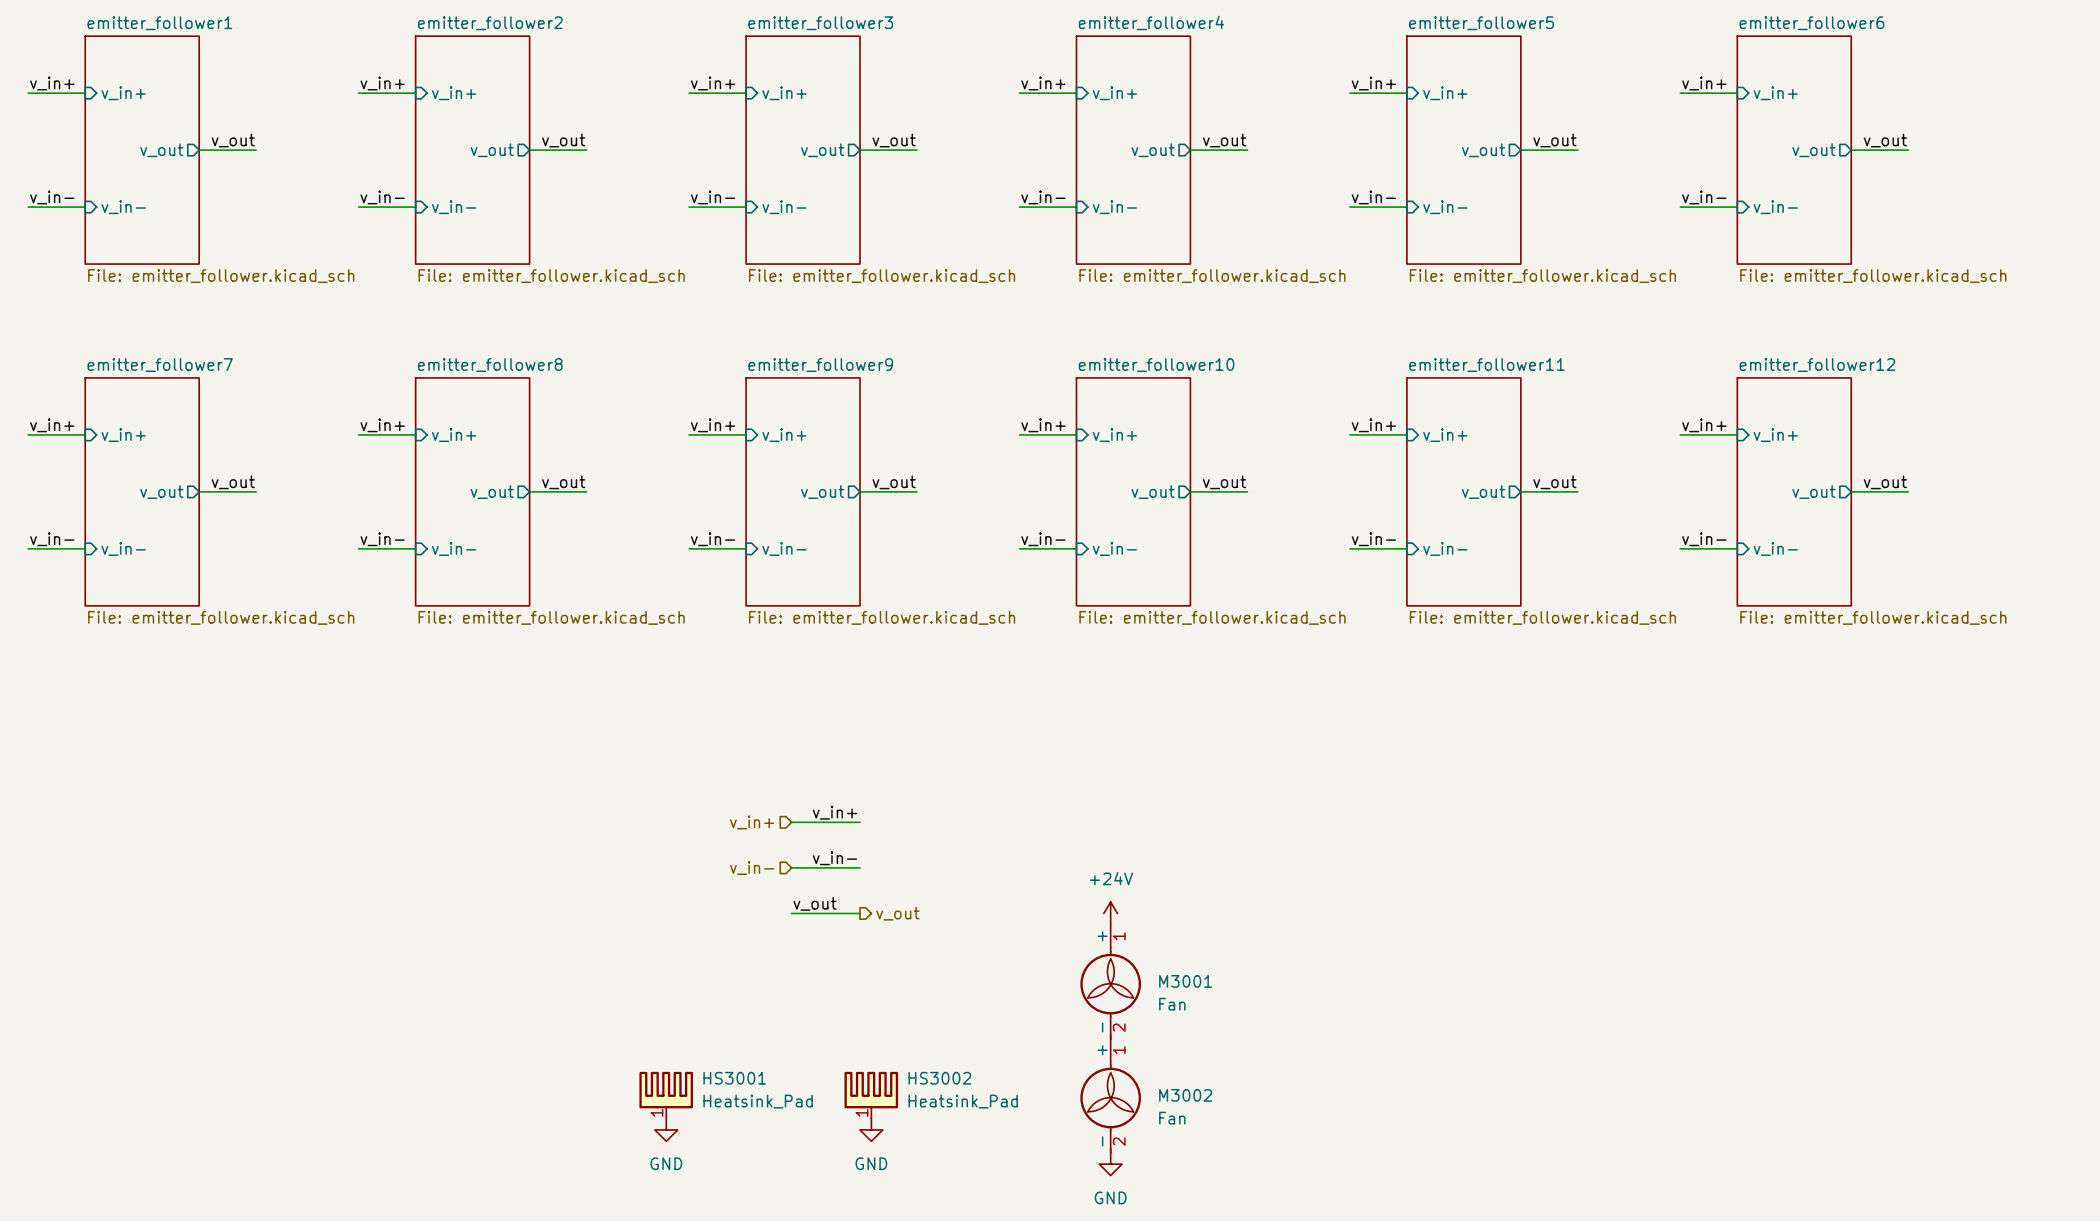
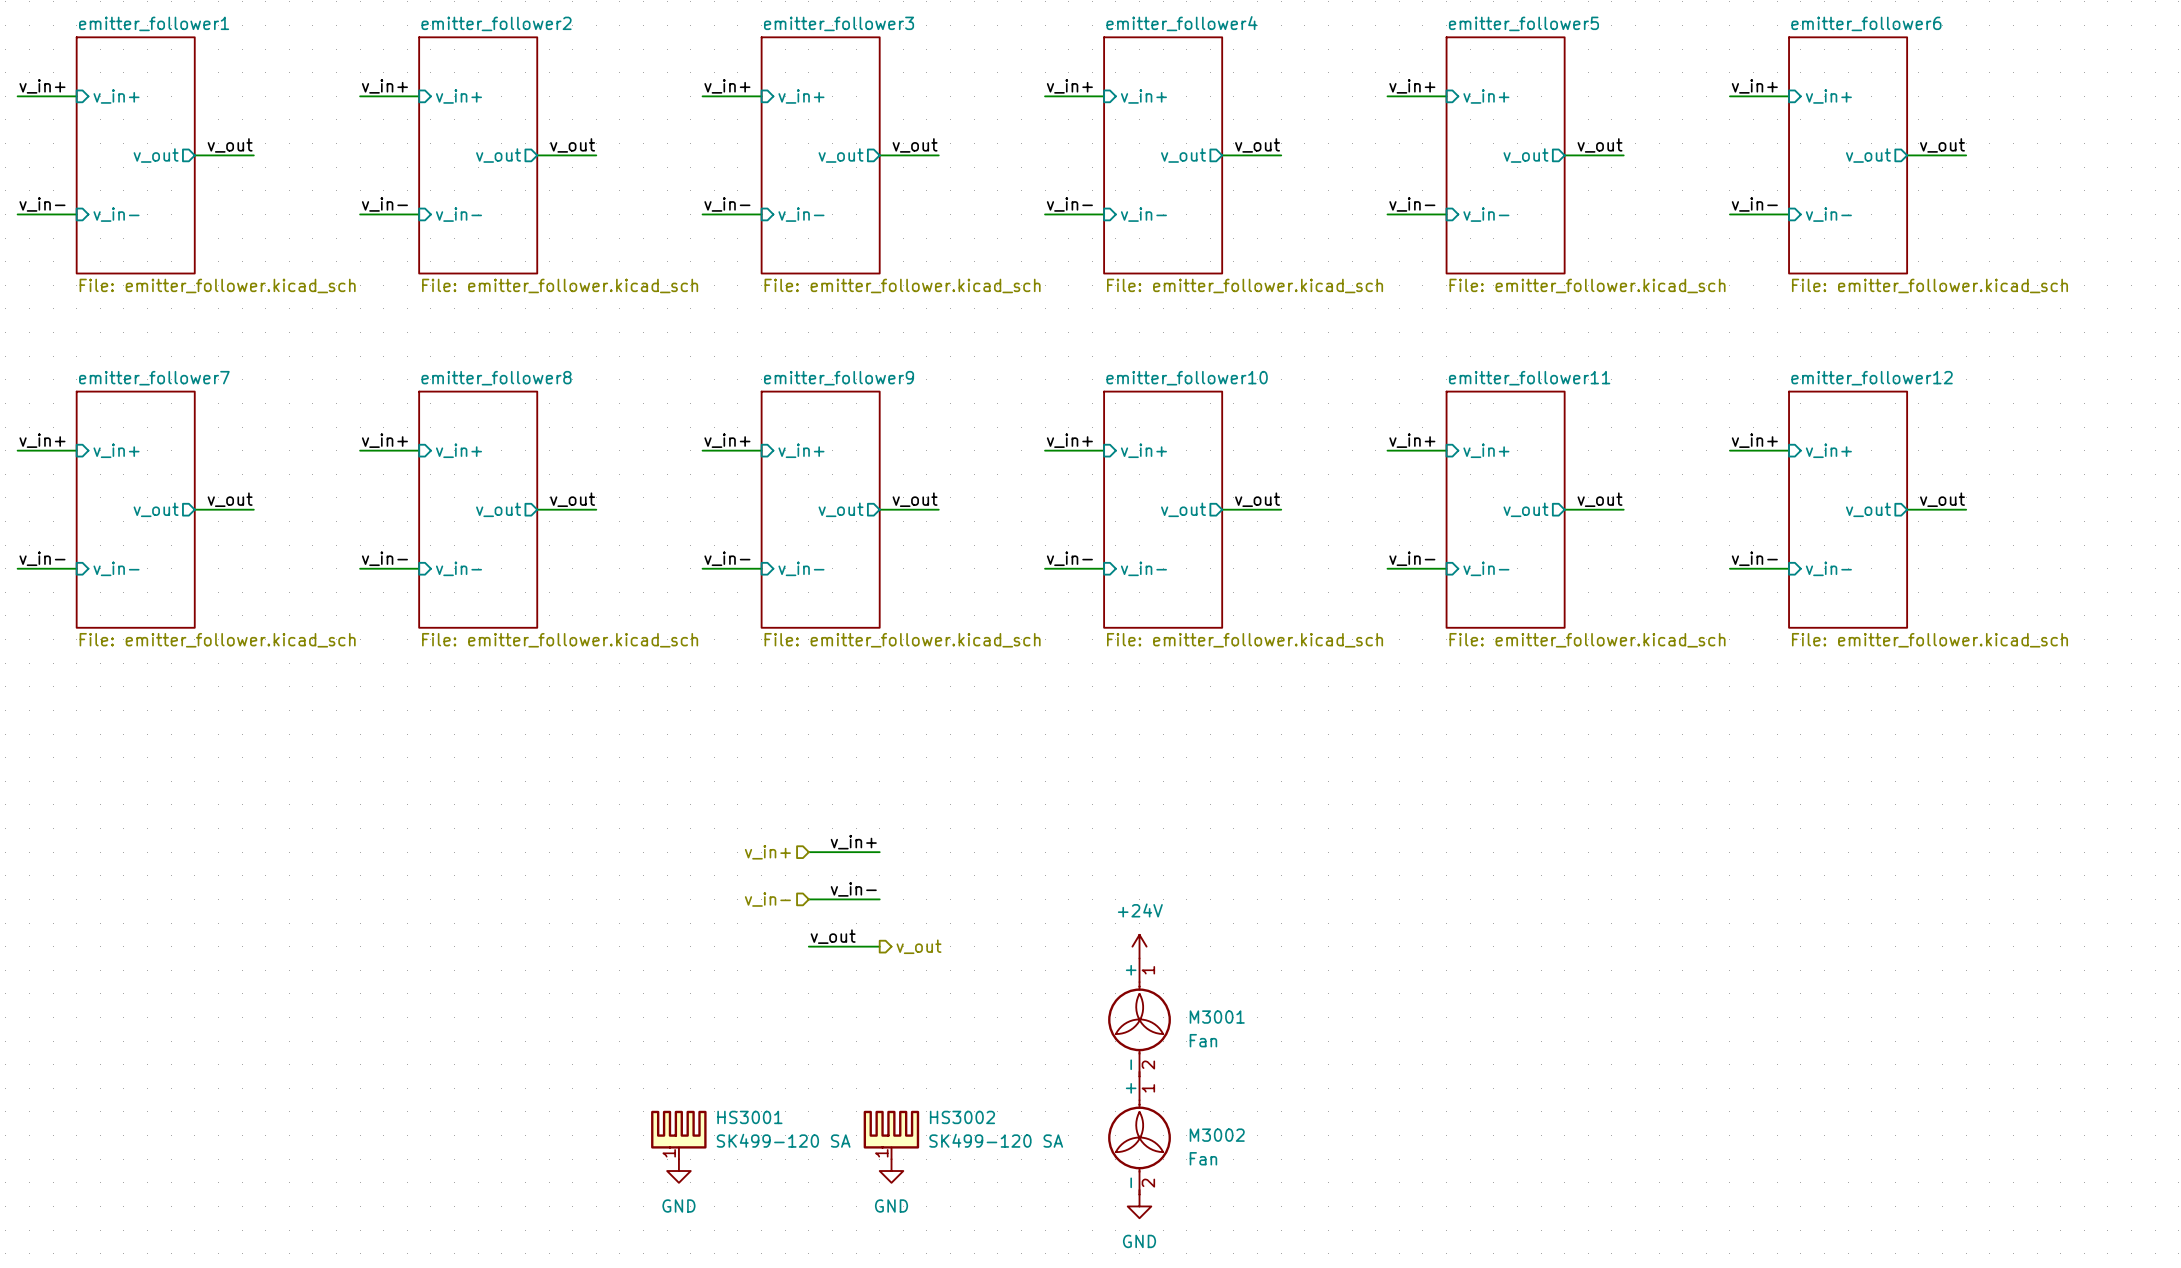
HS3001 value: Heatsink_Pad (758, 1101) -> SK499-120 SA (783, 1140)
HS3002 value: Heatsink_Pad (963, 1101) -> SK499-120 SA (996, 1140)

